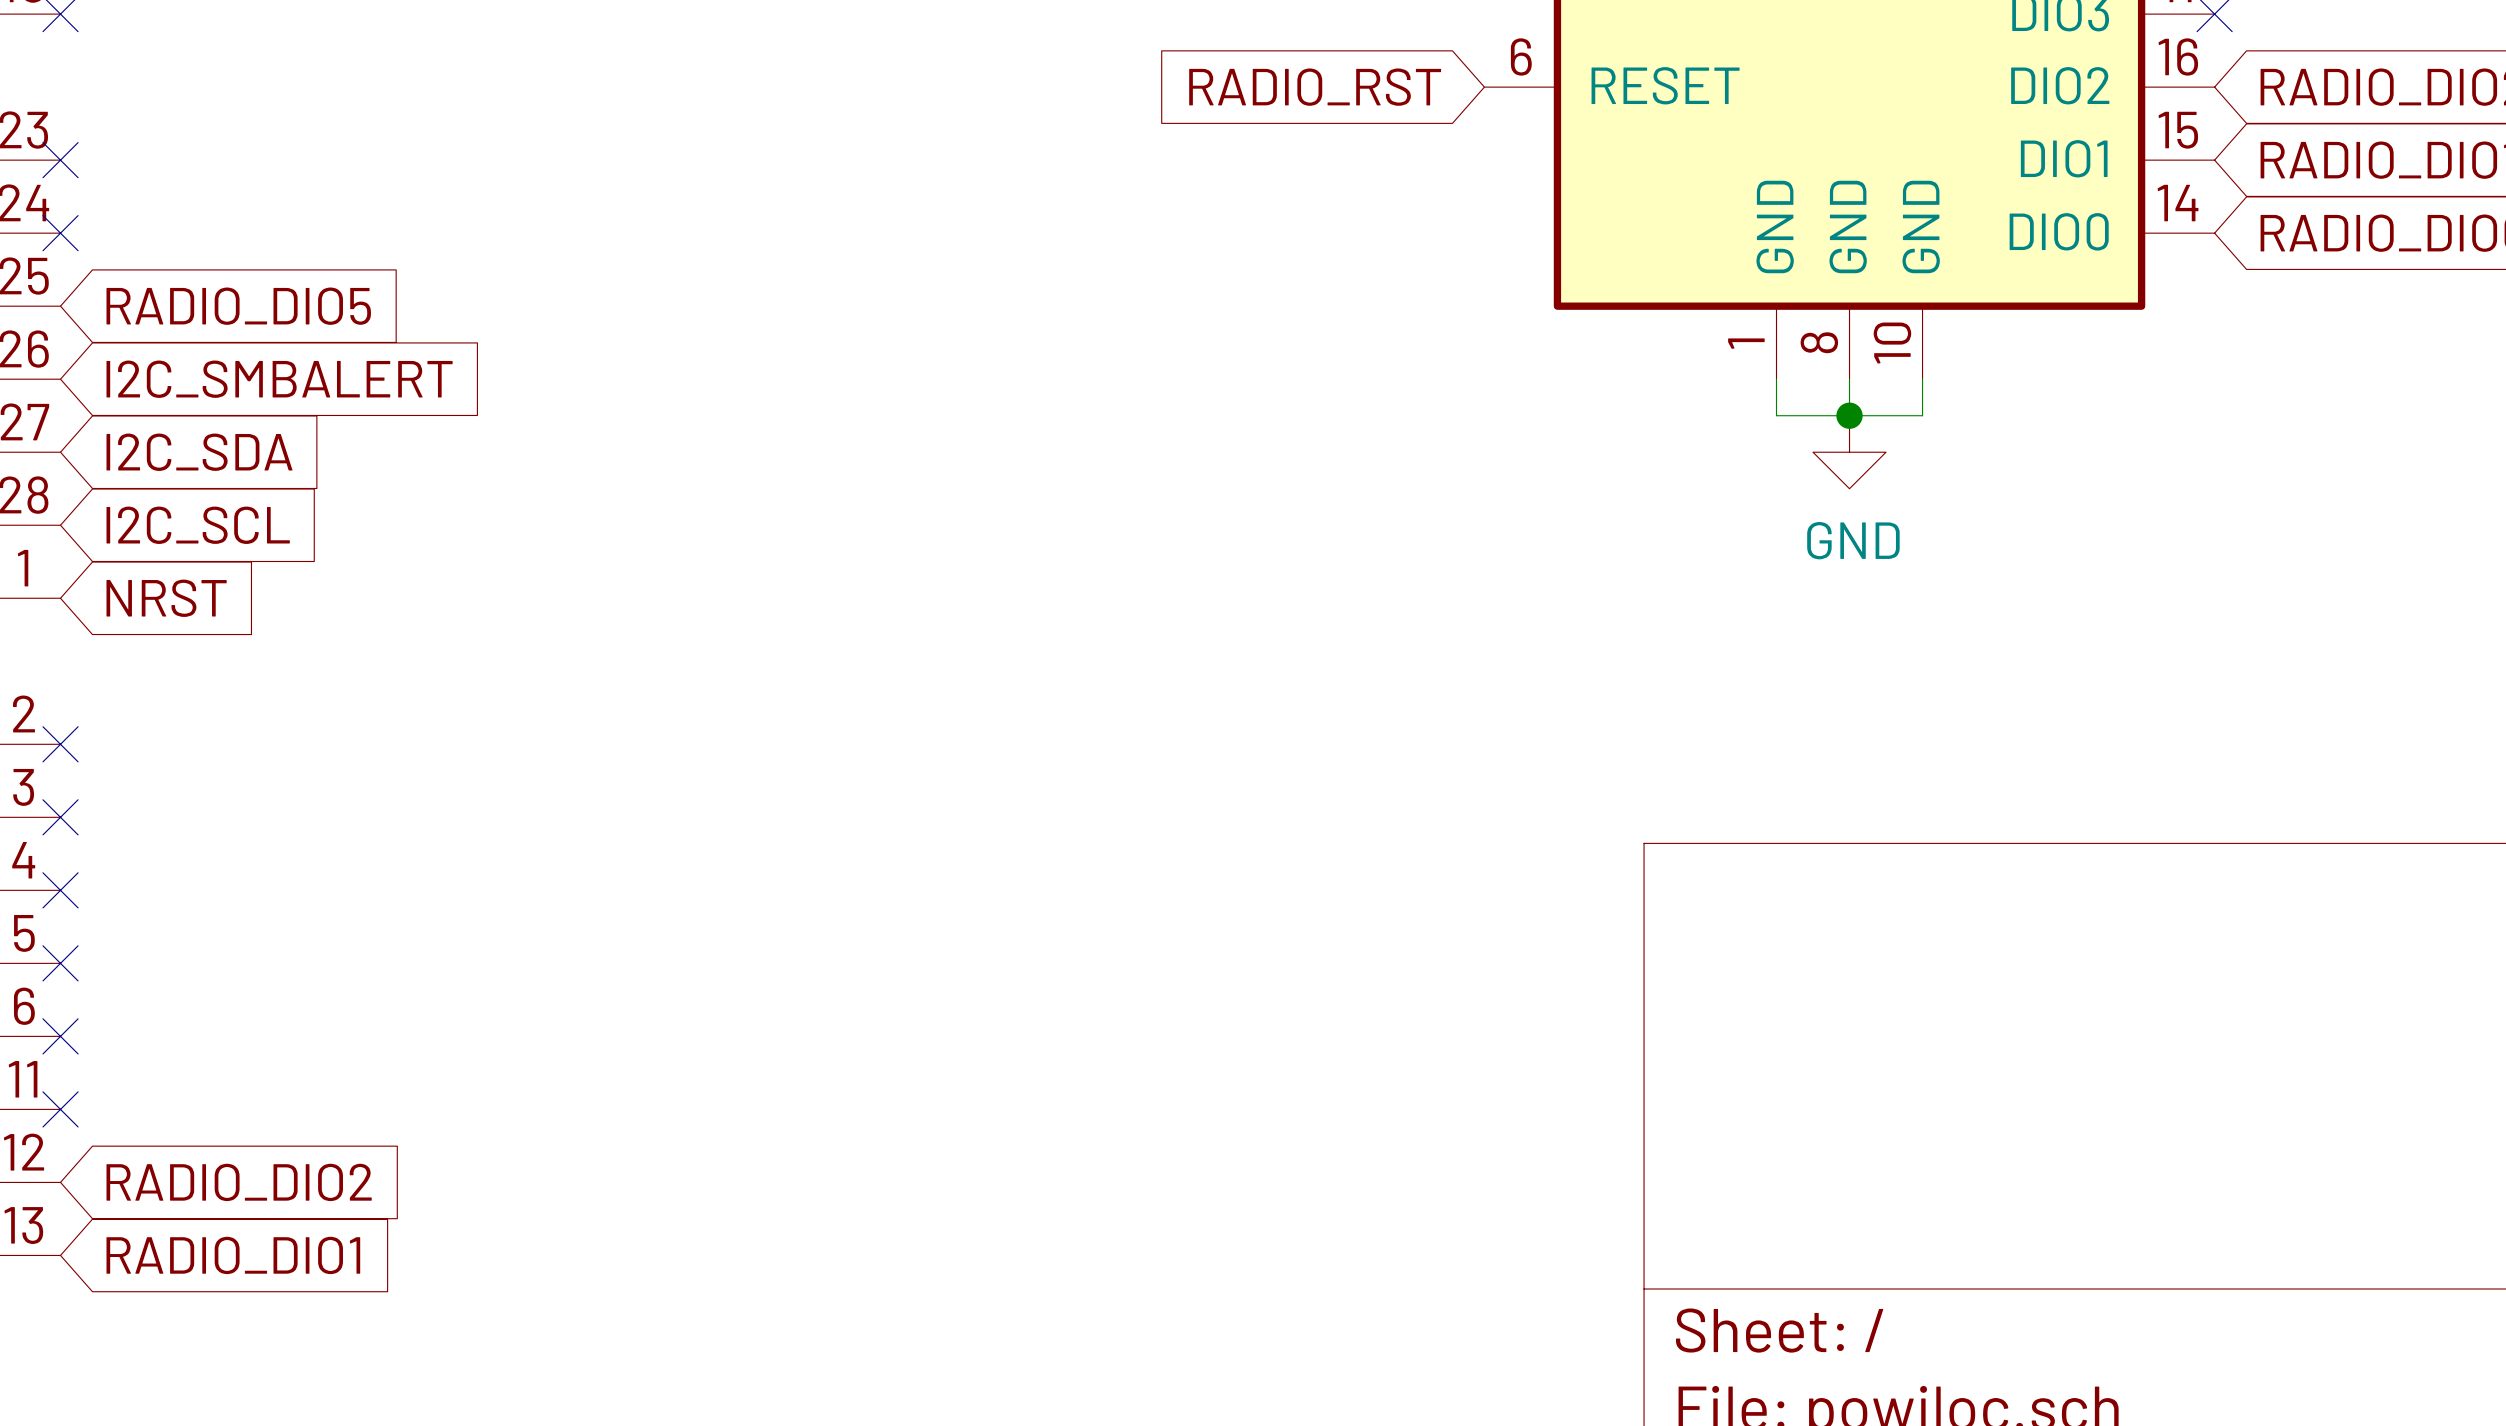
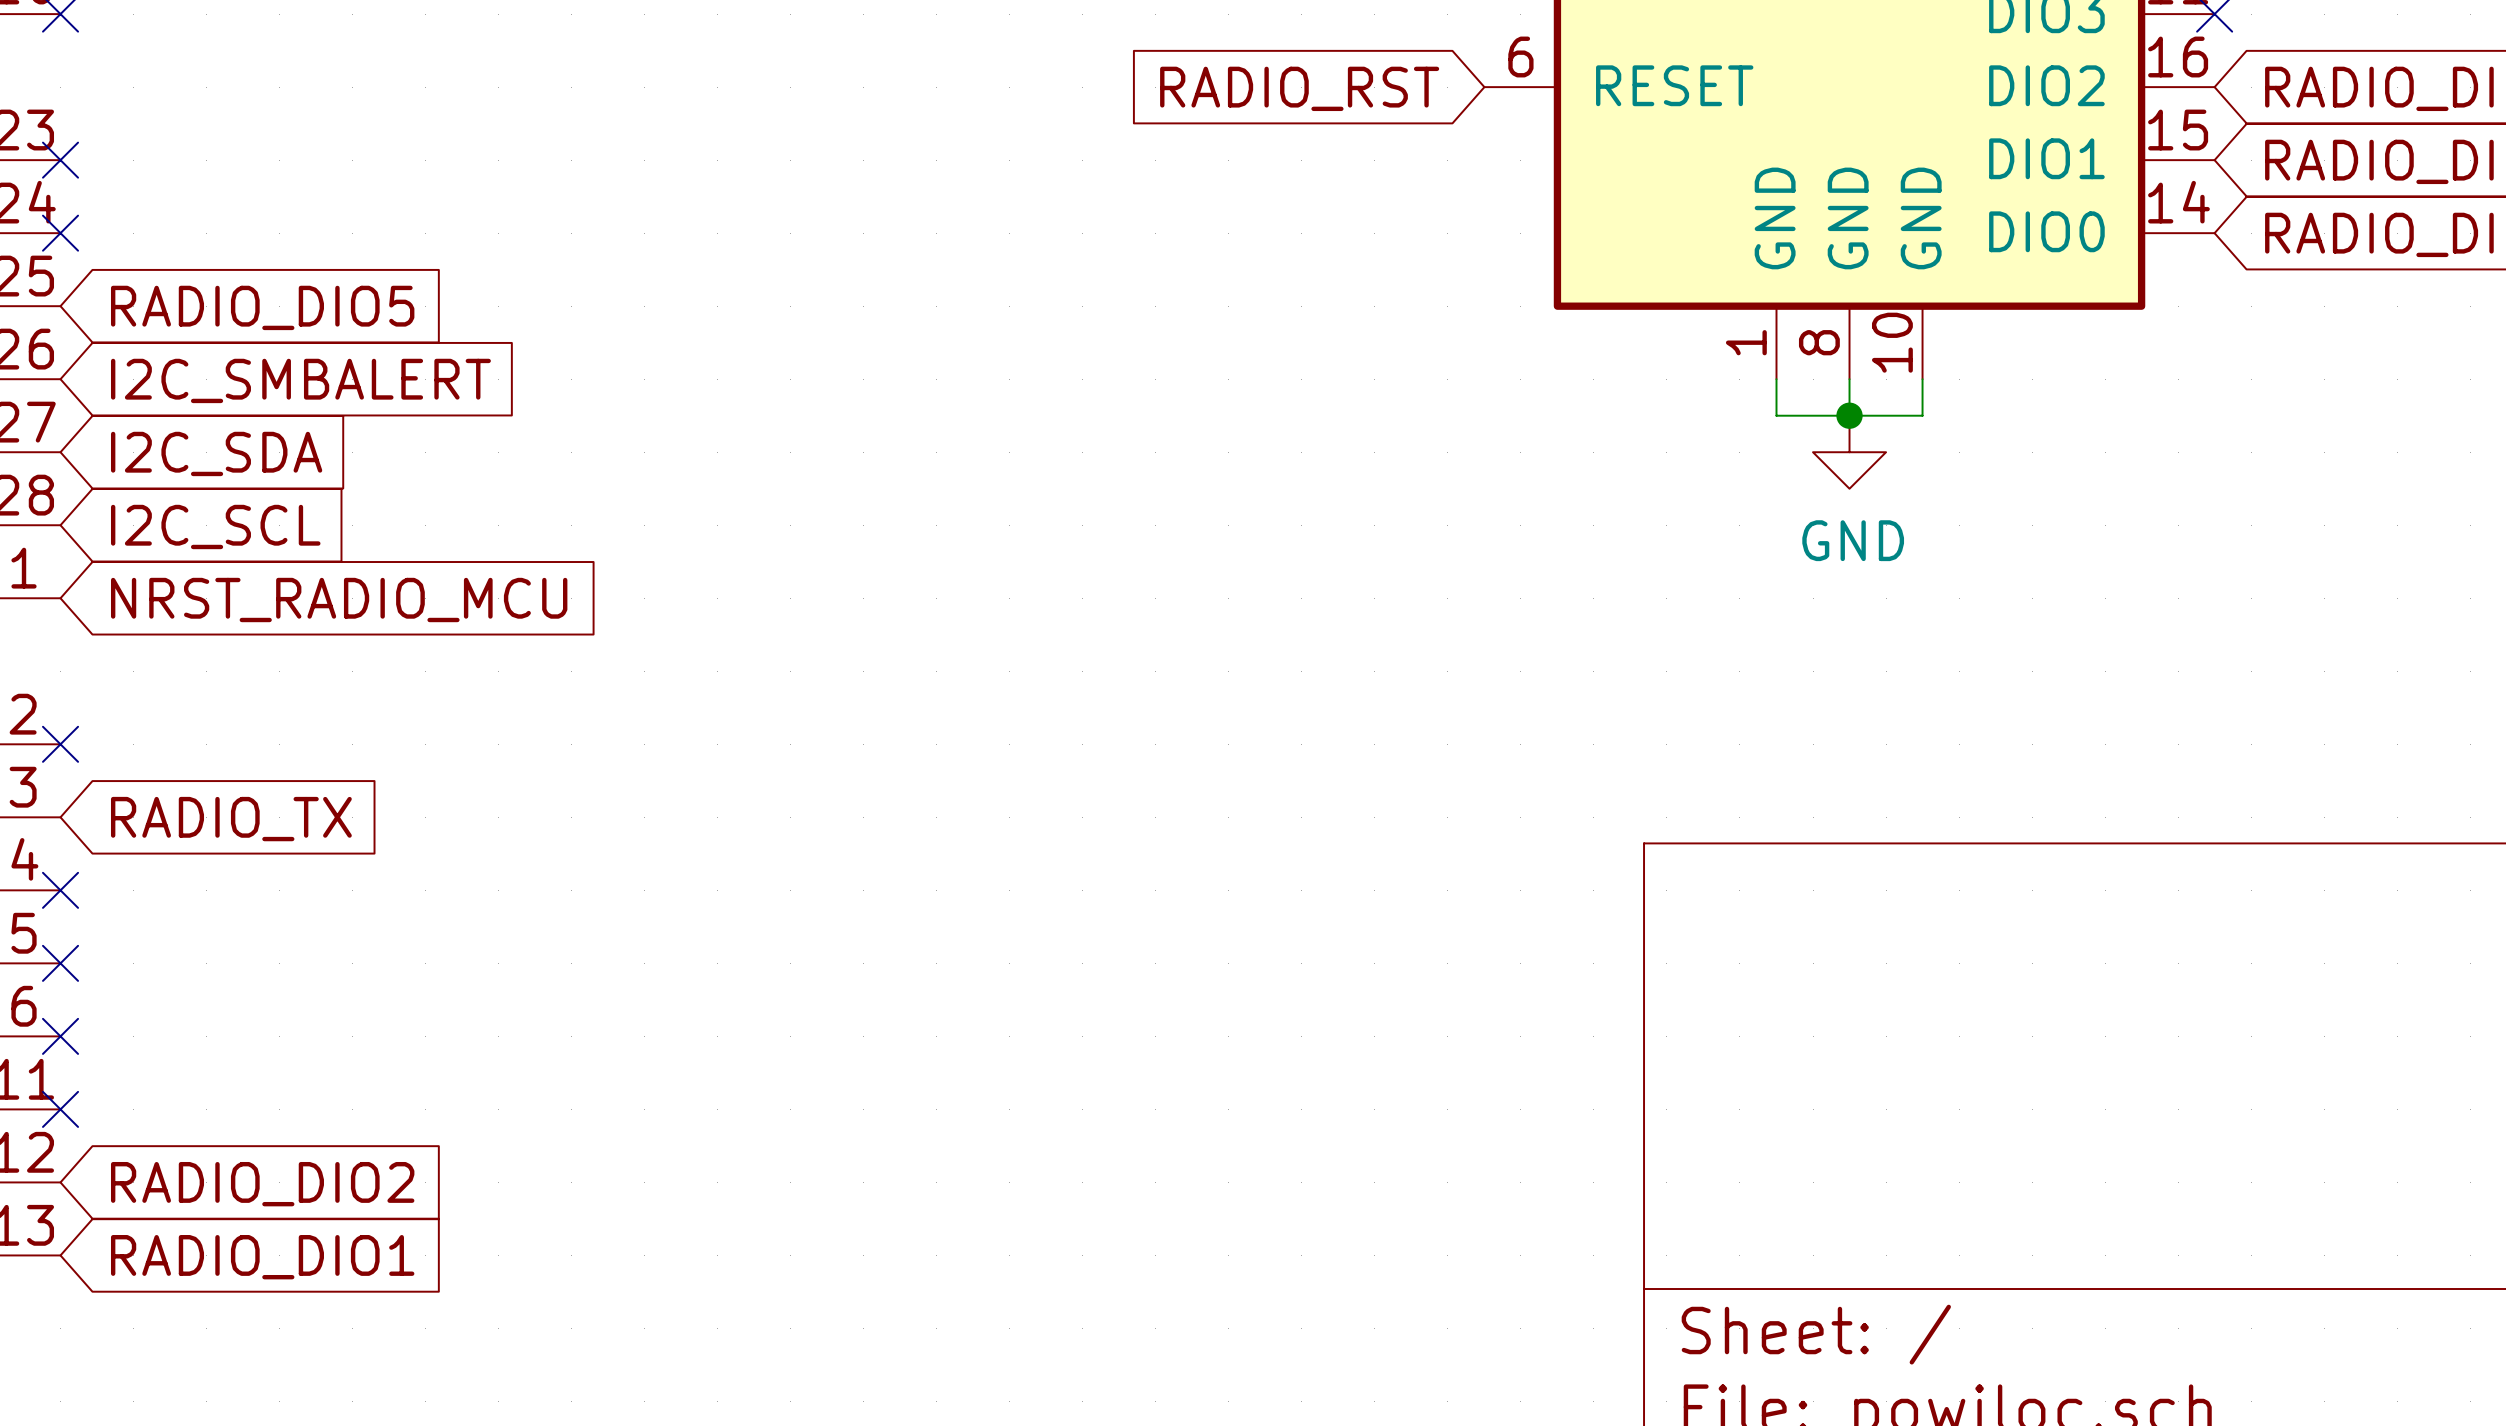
global label: NRST (166, 598) -> NRST_RADIO_MCU (339, 600)
no-connect mark: (60, 817) -> none
global label: none -> RADIO_TX (231, 819)

